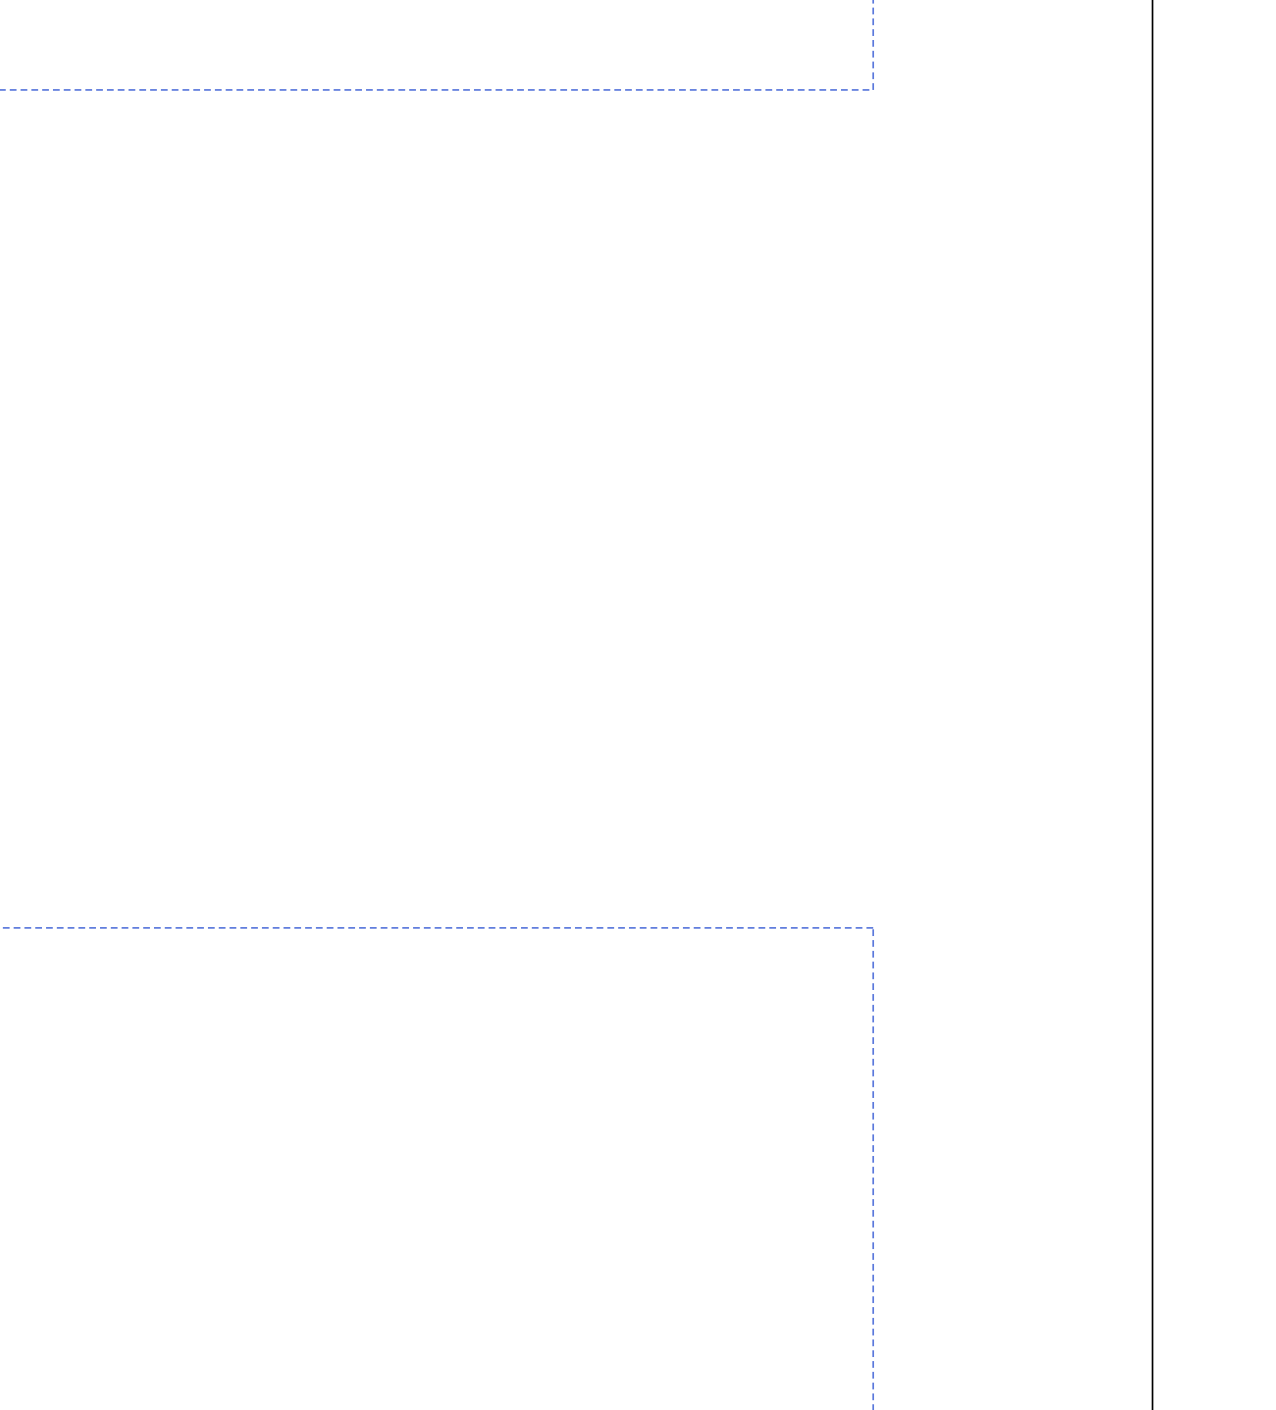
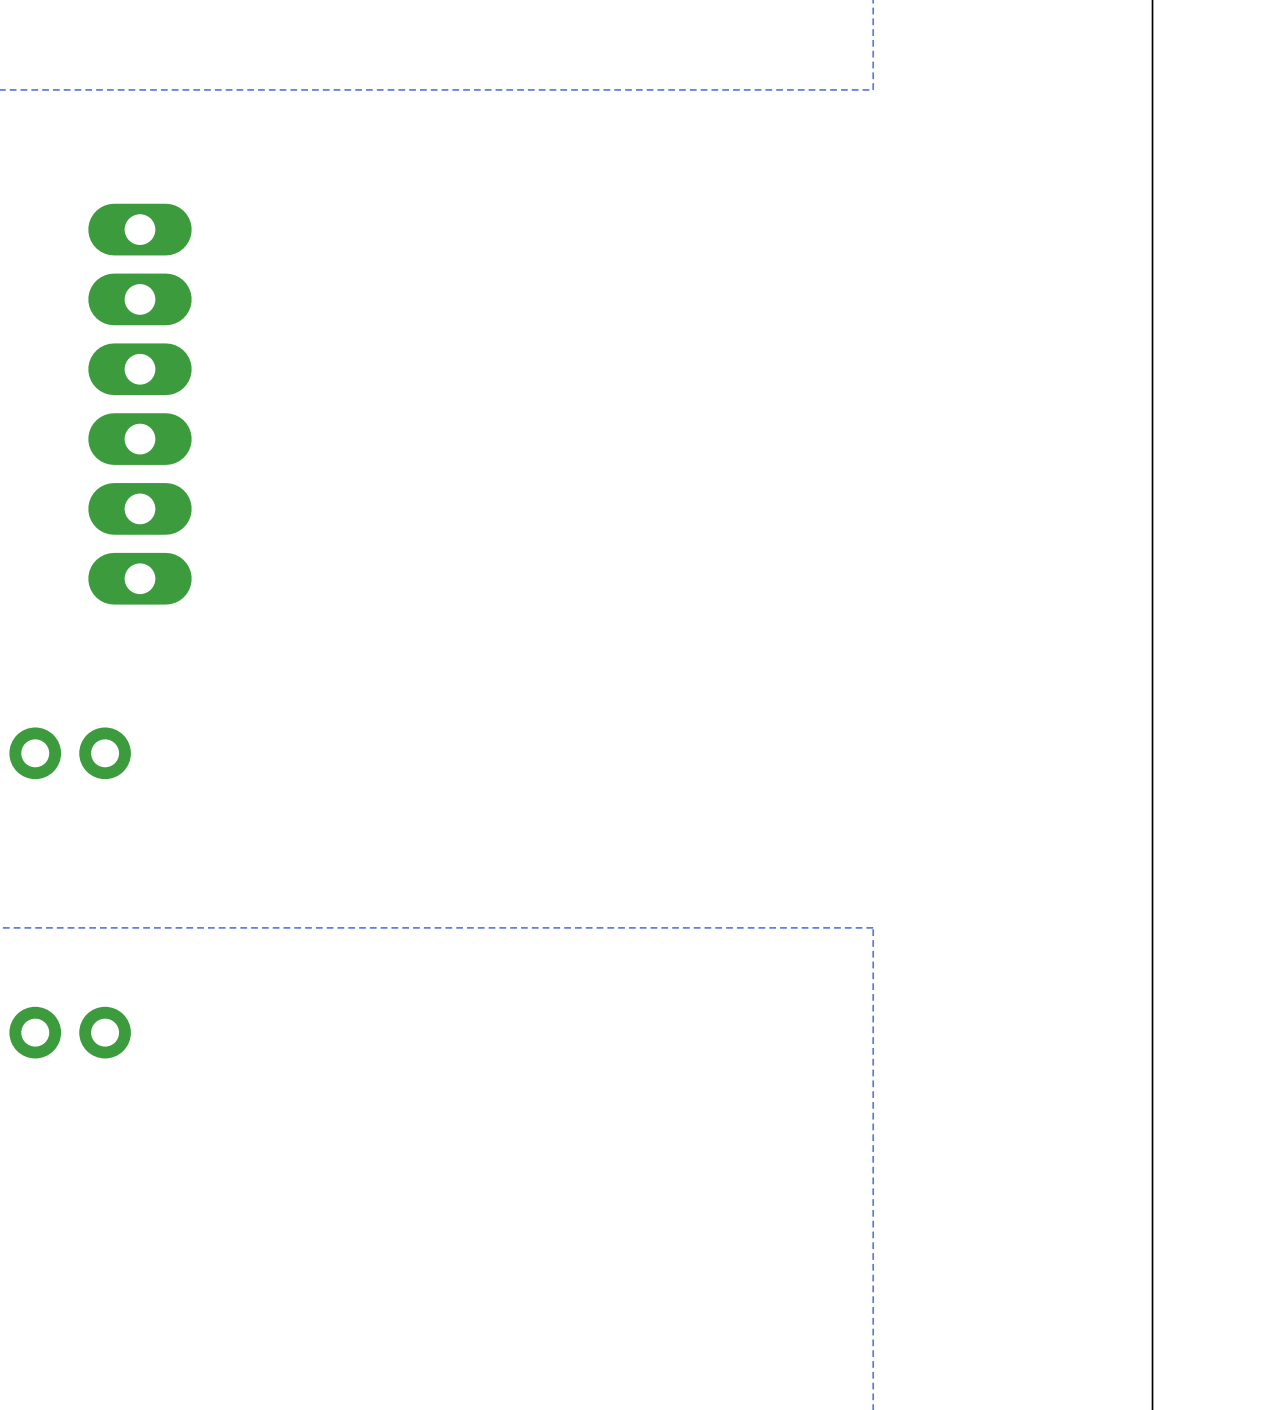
part: none -> (139, 404)
part: none -> (35, 753)
part: none -> (105, 753)
part: none -> (35, 1032)
part: none -> (105, 1032)

